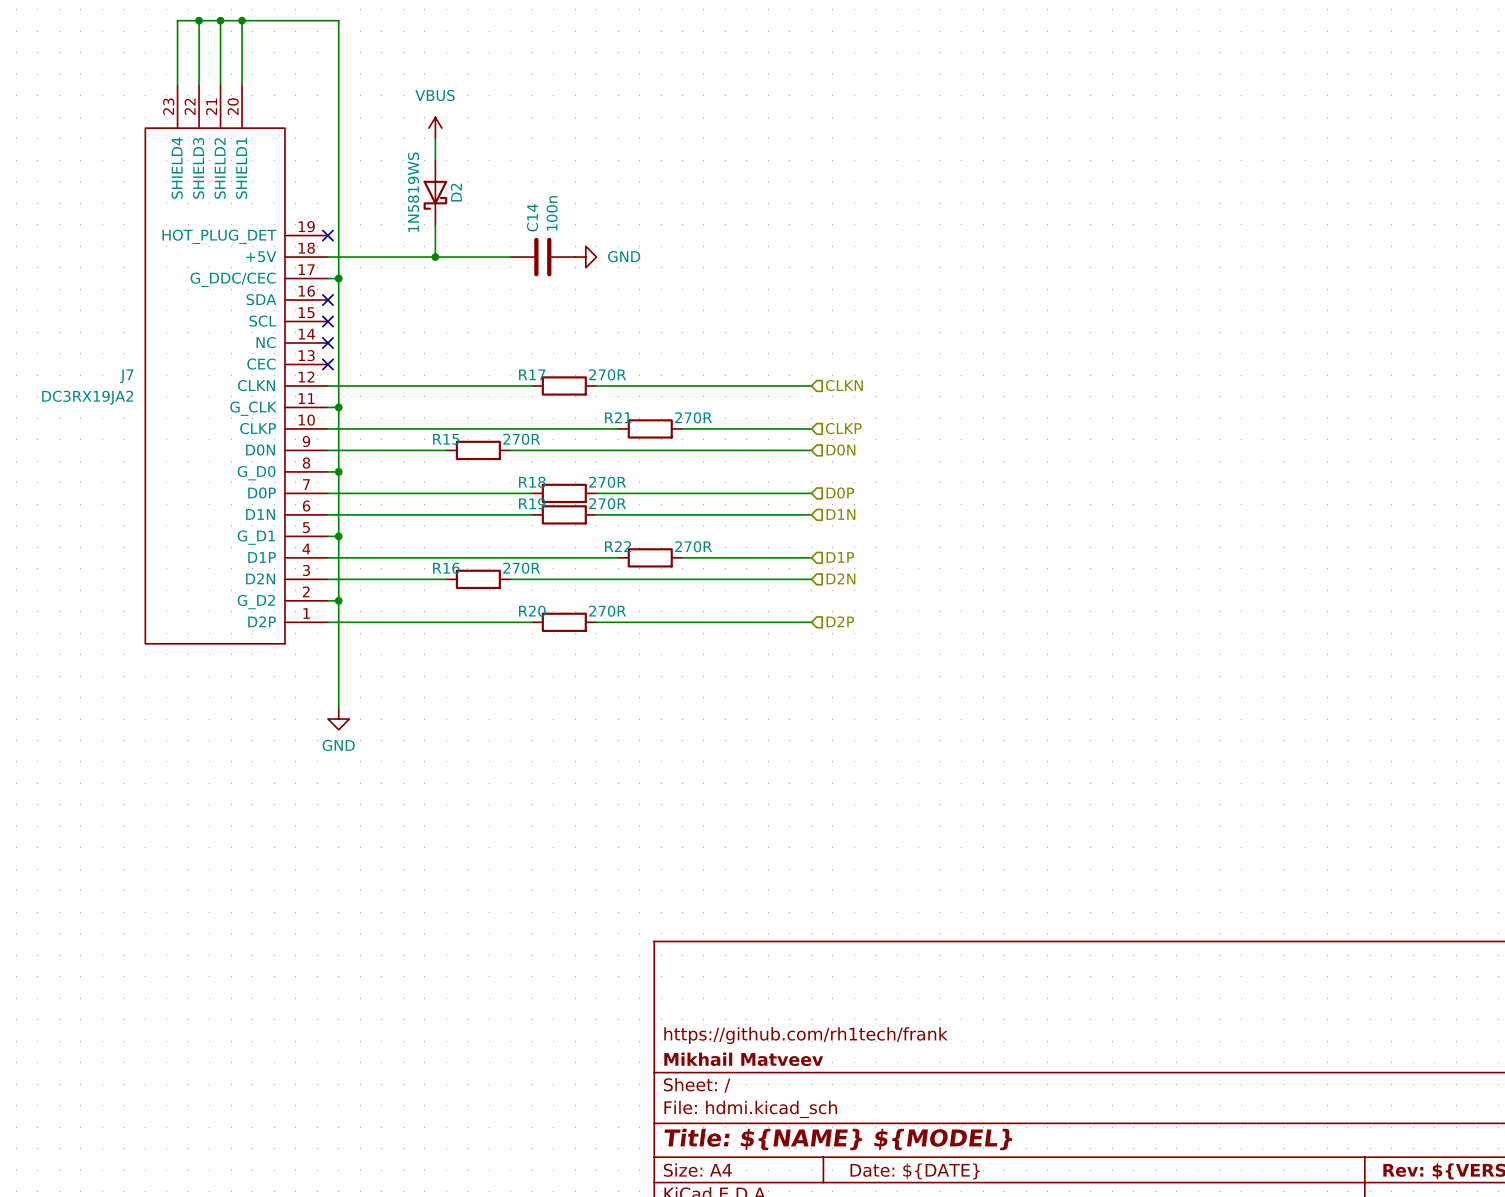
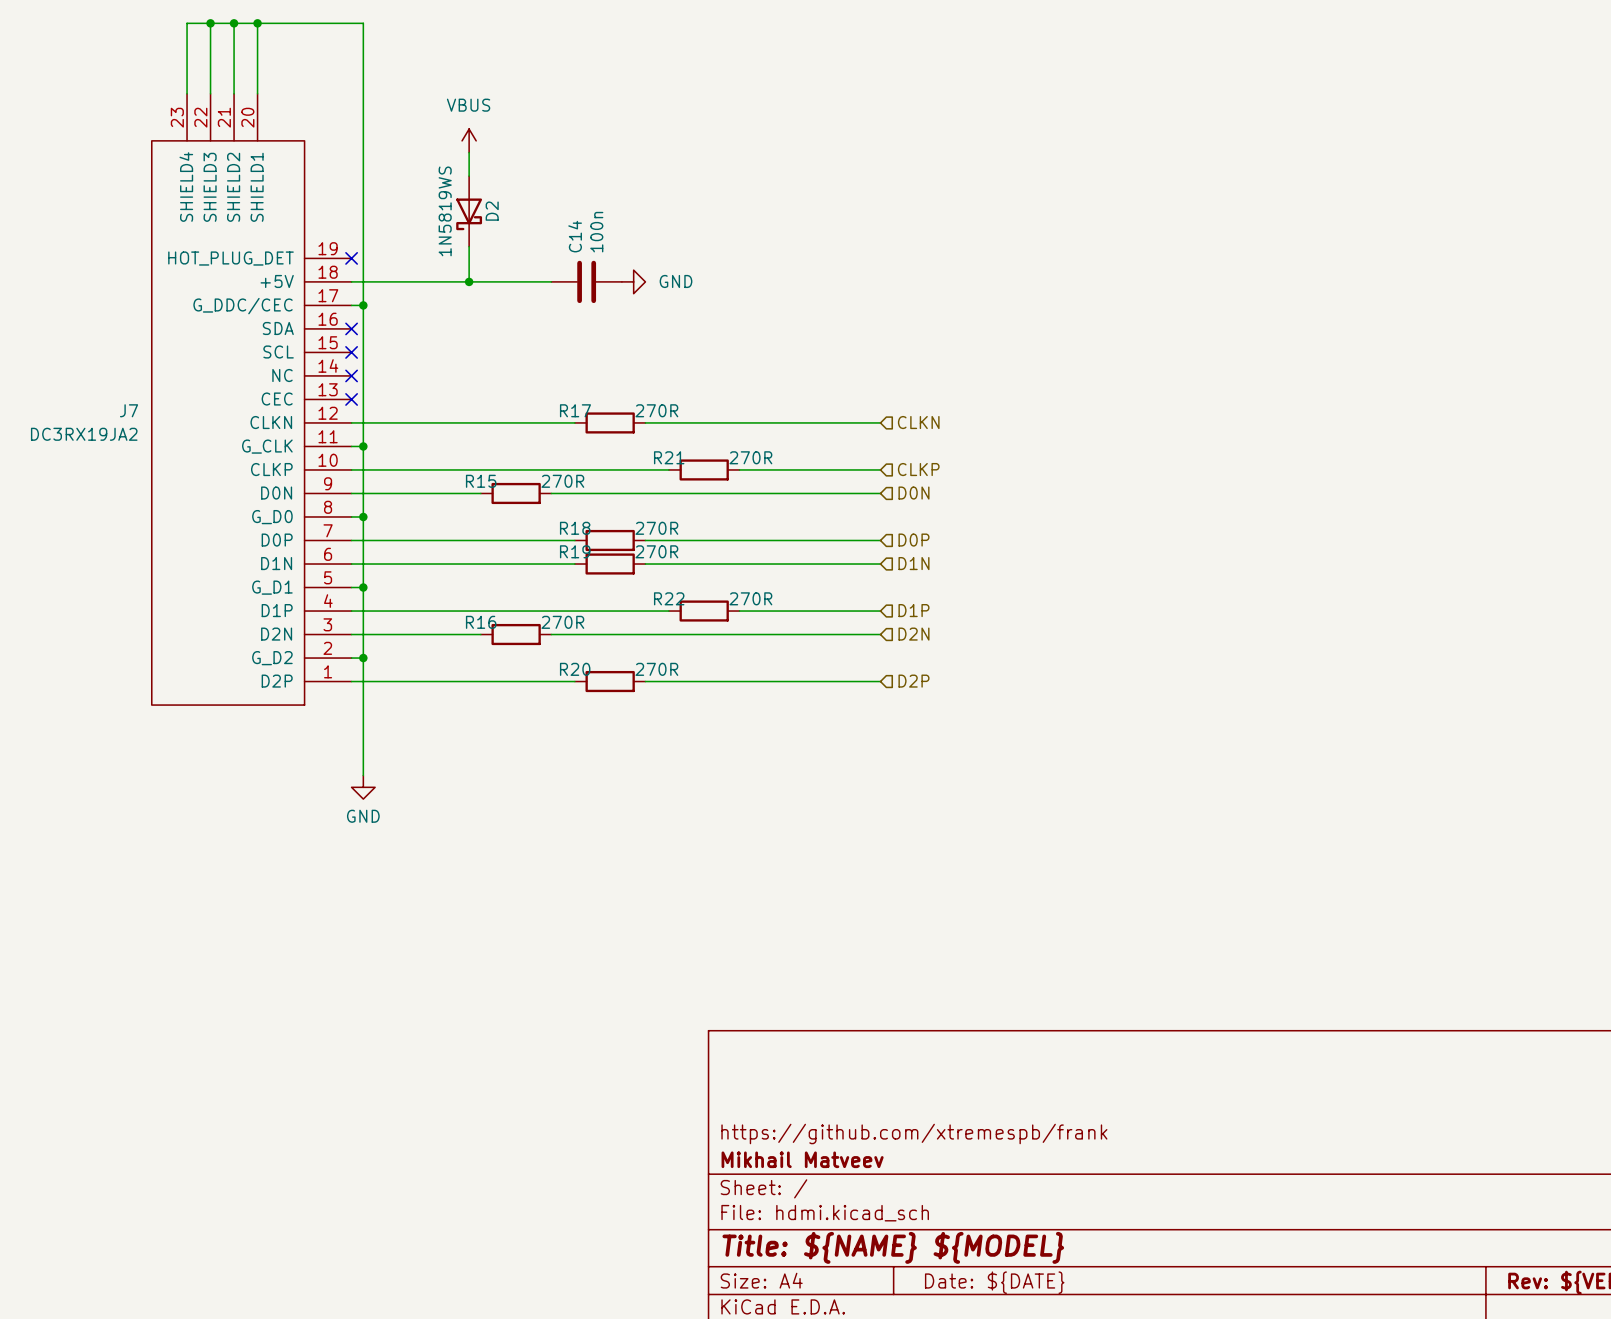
title block: https://github.com/rh1tech/frank (806, 1035) -> https://github.com/xtremespb/frank (914, 1133)

